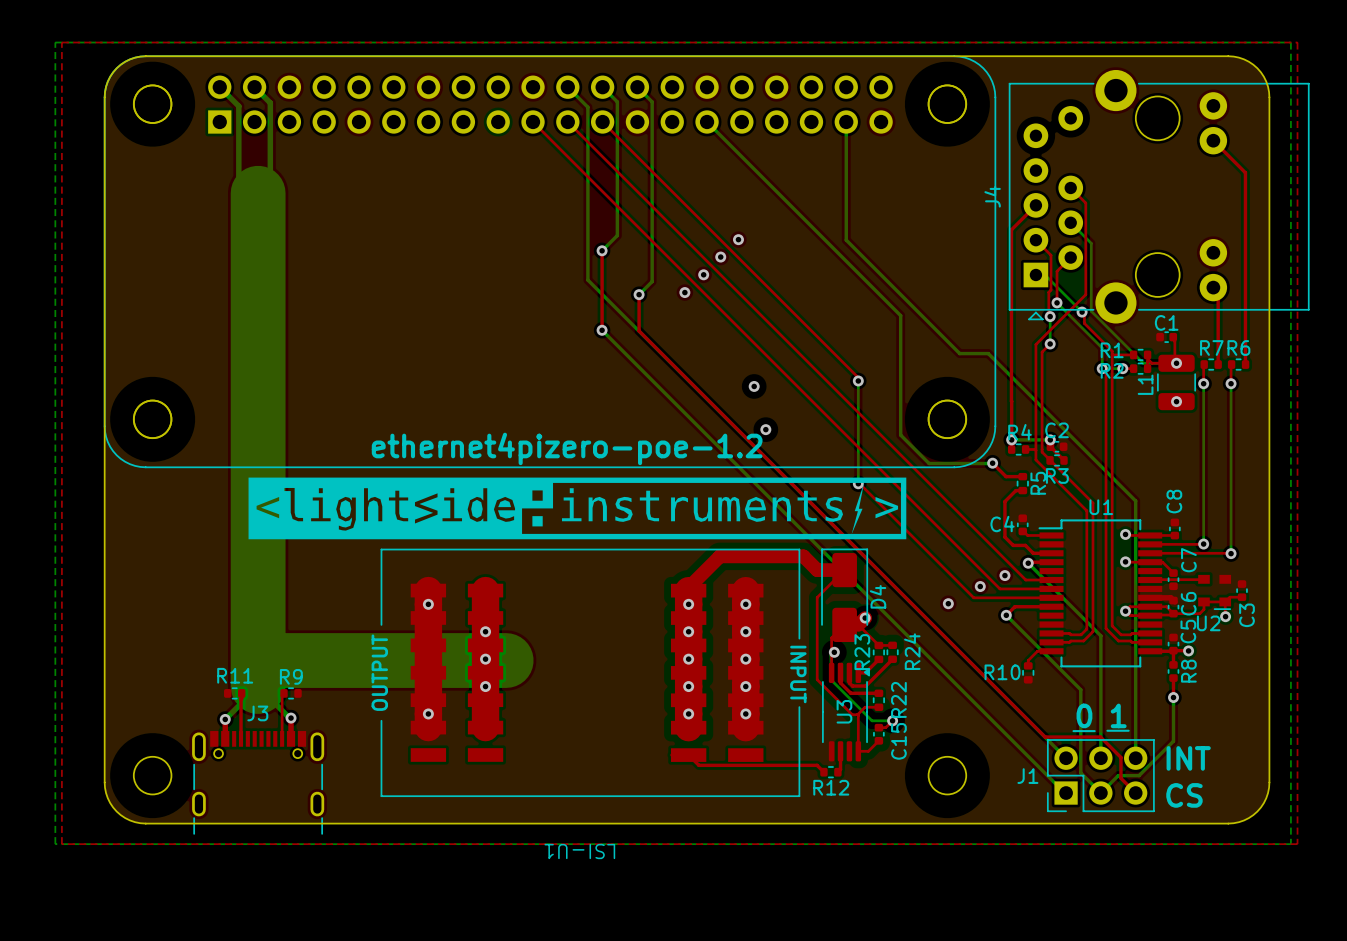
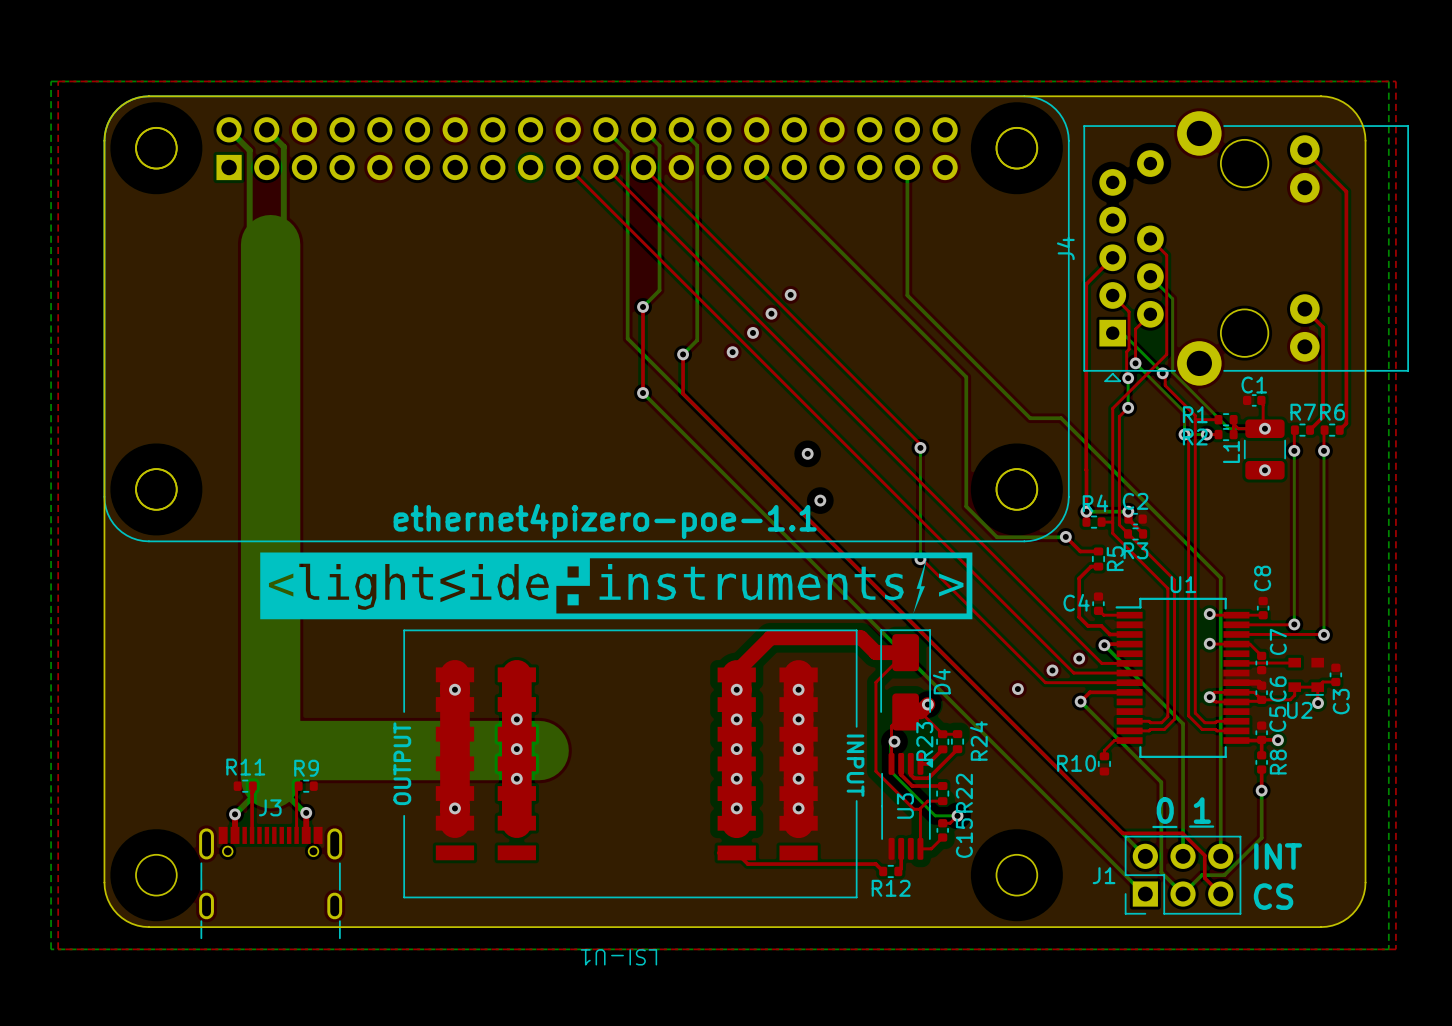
top track: (1213, 140) (1245, 172) (1245, 364) -> (1304, 150) (1346, 191) (1346, 423) (1339, 430)
top track: (1213, 286) (1218, 291) (1218, 364) -> (1304, 309) (1323, 327) (1323, 417) (1310, 430)
text: ethernet4pizero-poe-1.2 (567, 448) -> ethernet4pizero-poe-1.1 (605, 521)

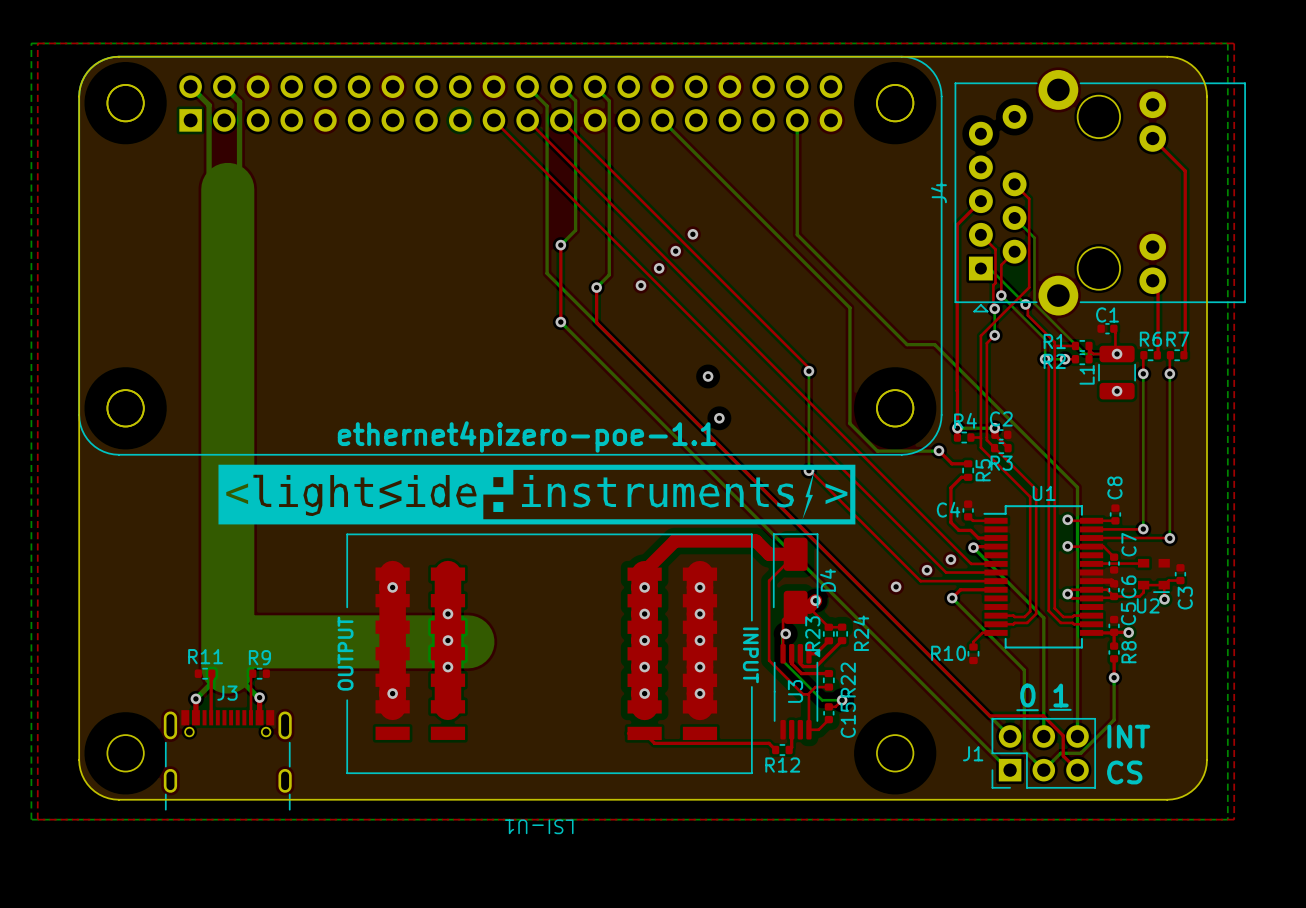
top track: (1304, 150) (1346, 191) (1346, 423) (1339, 430) -> none
top track: none -> (1152, 138) (1185, 171) (1185, 355)
top track: (1304, 309) (1323, 327) (1323, 417) (1310, 430) -> none
top track: none -> (1158, 286) (1158, 355)
R7 name: R7 (1303, 412) -> R6 (1150, 339)
R6 name: R6 (1332, 412) -> R7 (1177, 339)

